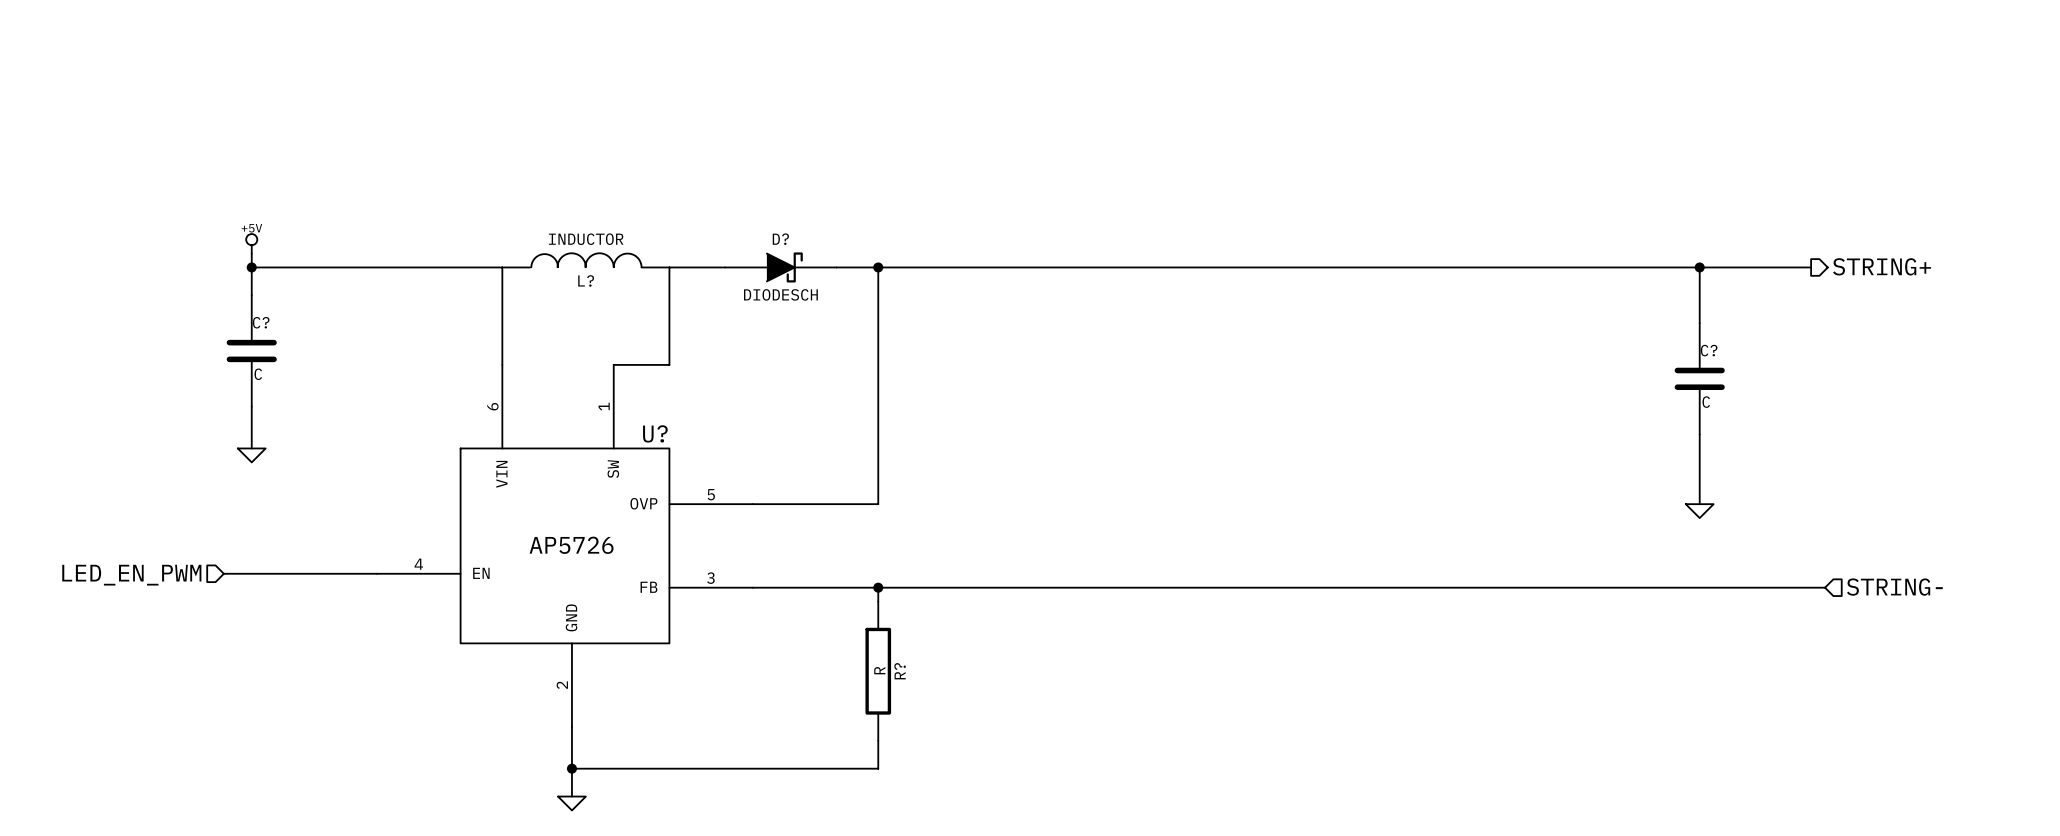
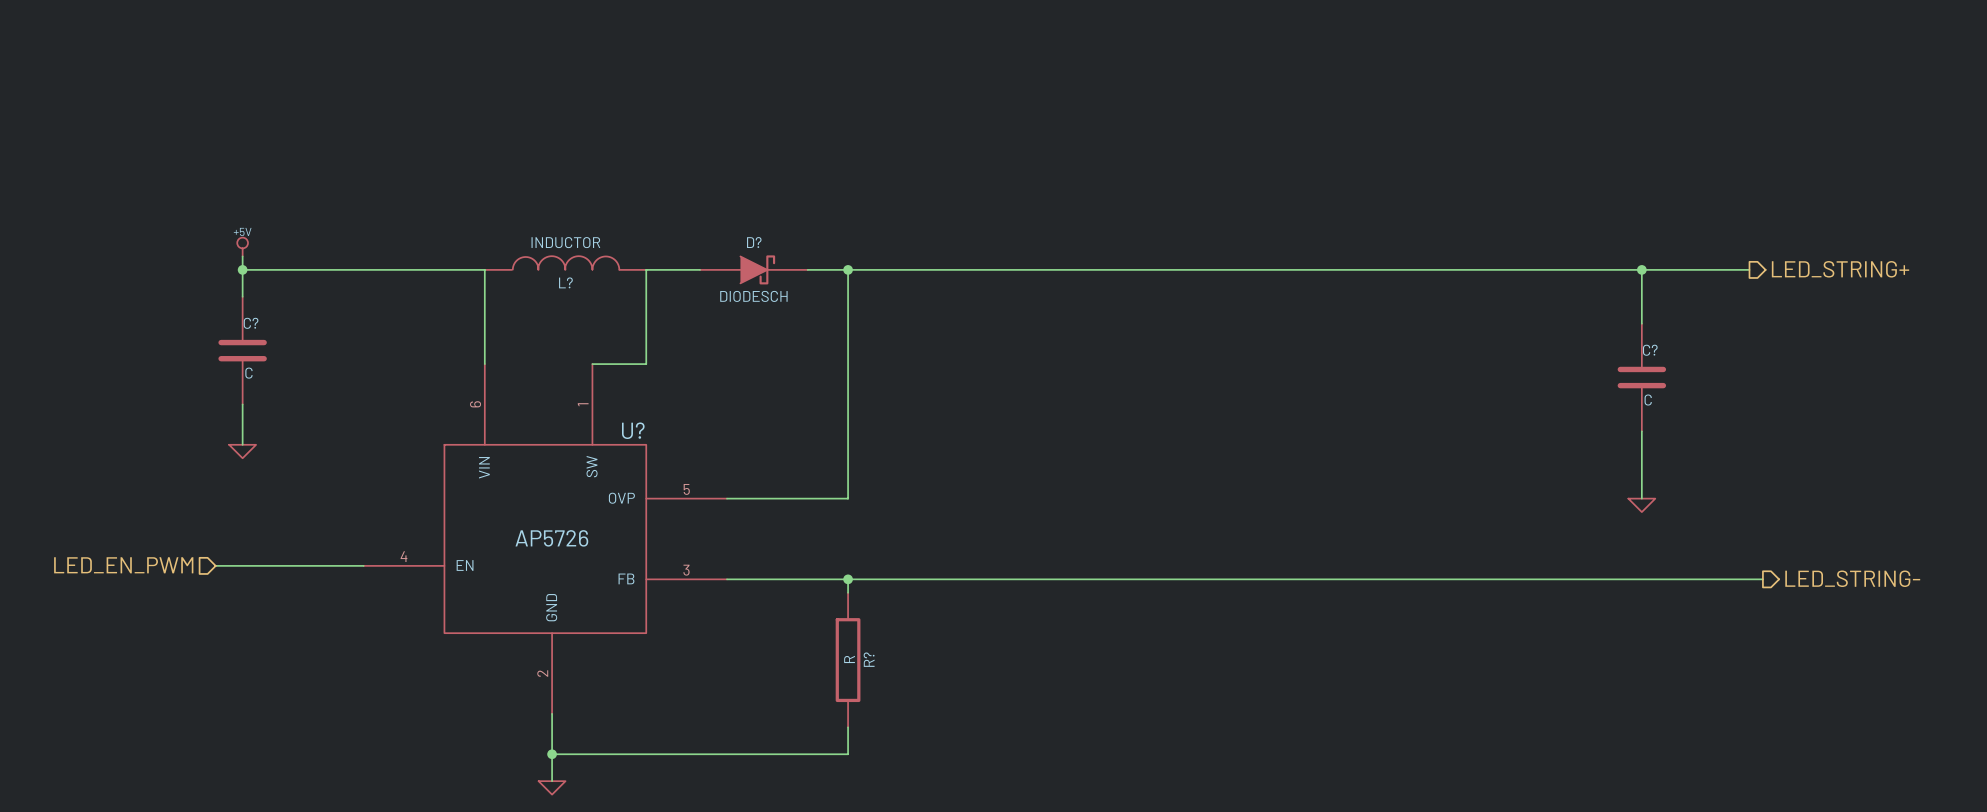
hierarchical label: STRING+ (1882, 266) -> LED_STRING+ (1840, 269)
hierarchical label shape: input (1894, 587) -> output (1852, 578)
hierarchical label: STRING- (1894, 587) -> LED_STRING- (1852, 578)

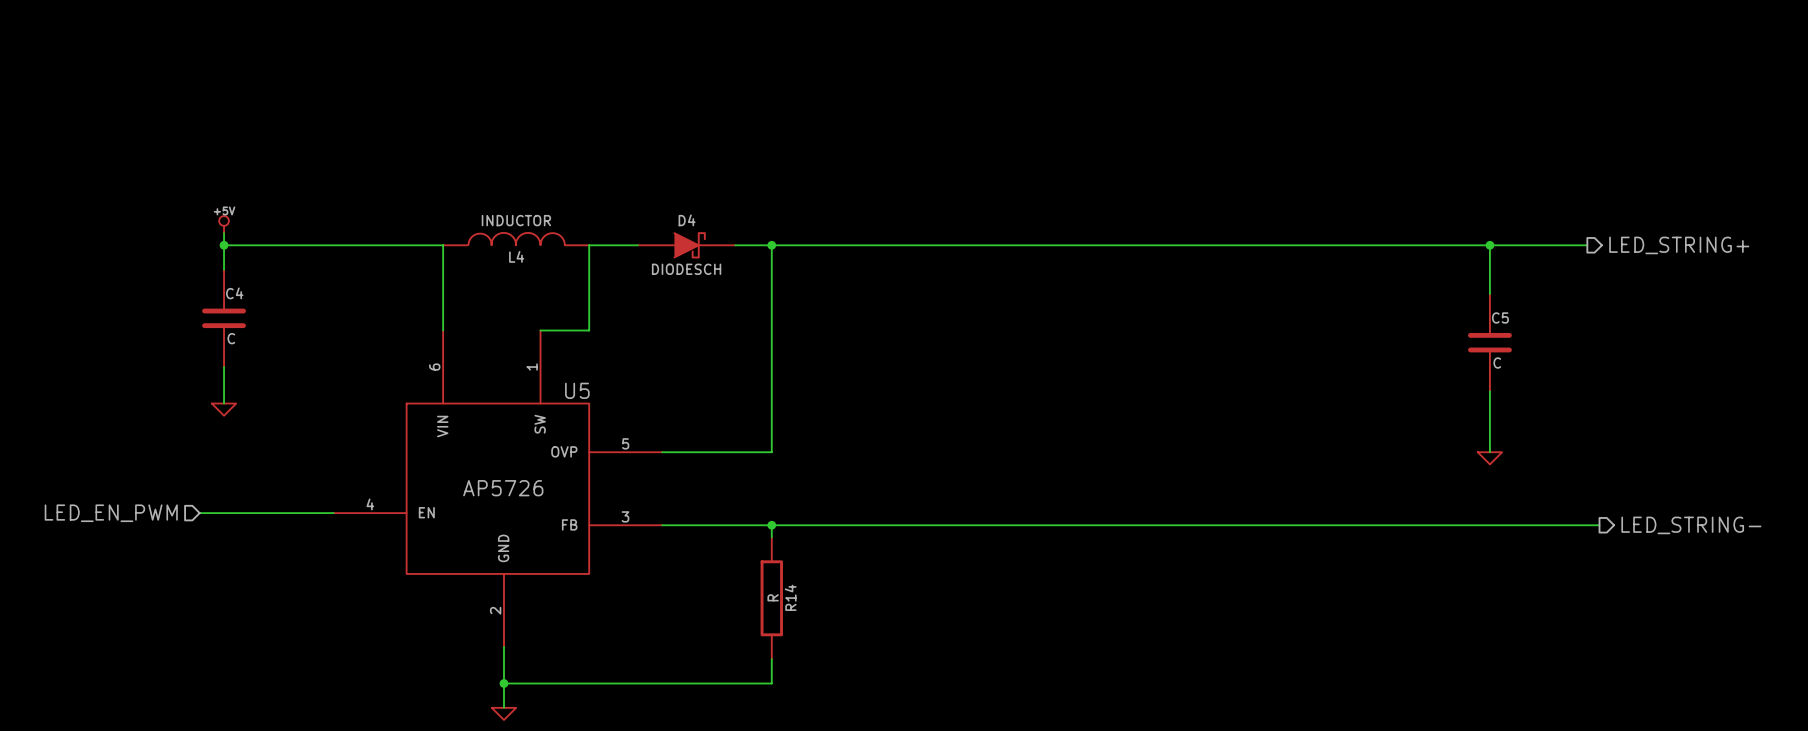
D? name: D? (754, 242) -> D4 (687, 220)
L? name: L? (565, 282) -> L4 (516, 256)
C? name: C? (251, 323) -> C4 (234, 293)
C? name: C? (1650, 350) -> C5 (1500, 317)
U? name: U? (633, 430) -> U5 (577, 390)
R? name: R? (869, 659) -> R14 (790, 597)

